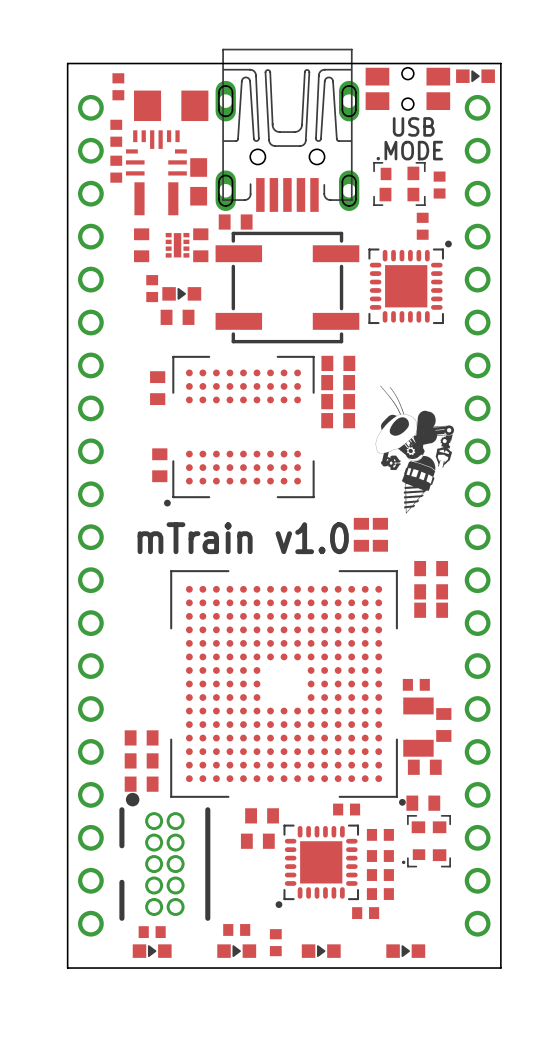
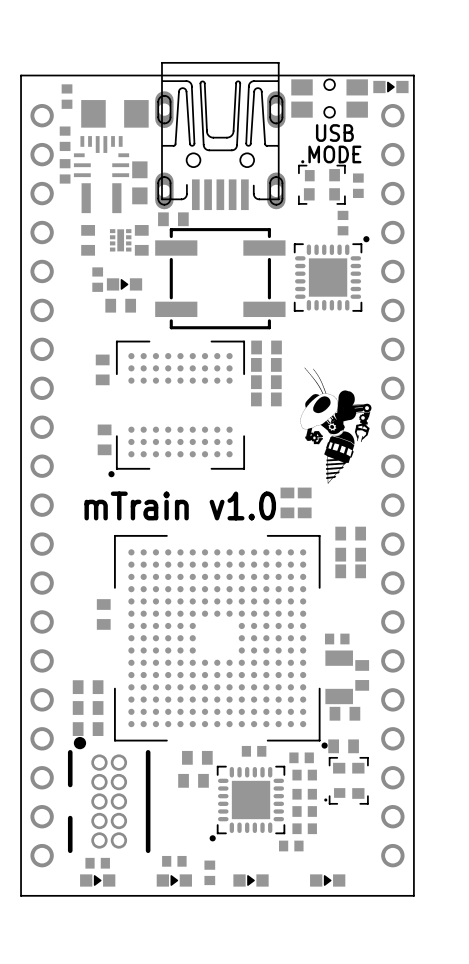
part: none -> (103, 614)
part: none -> (254, 751)
part: (346, 809) -> none
part: none -> (301, 757)

